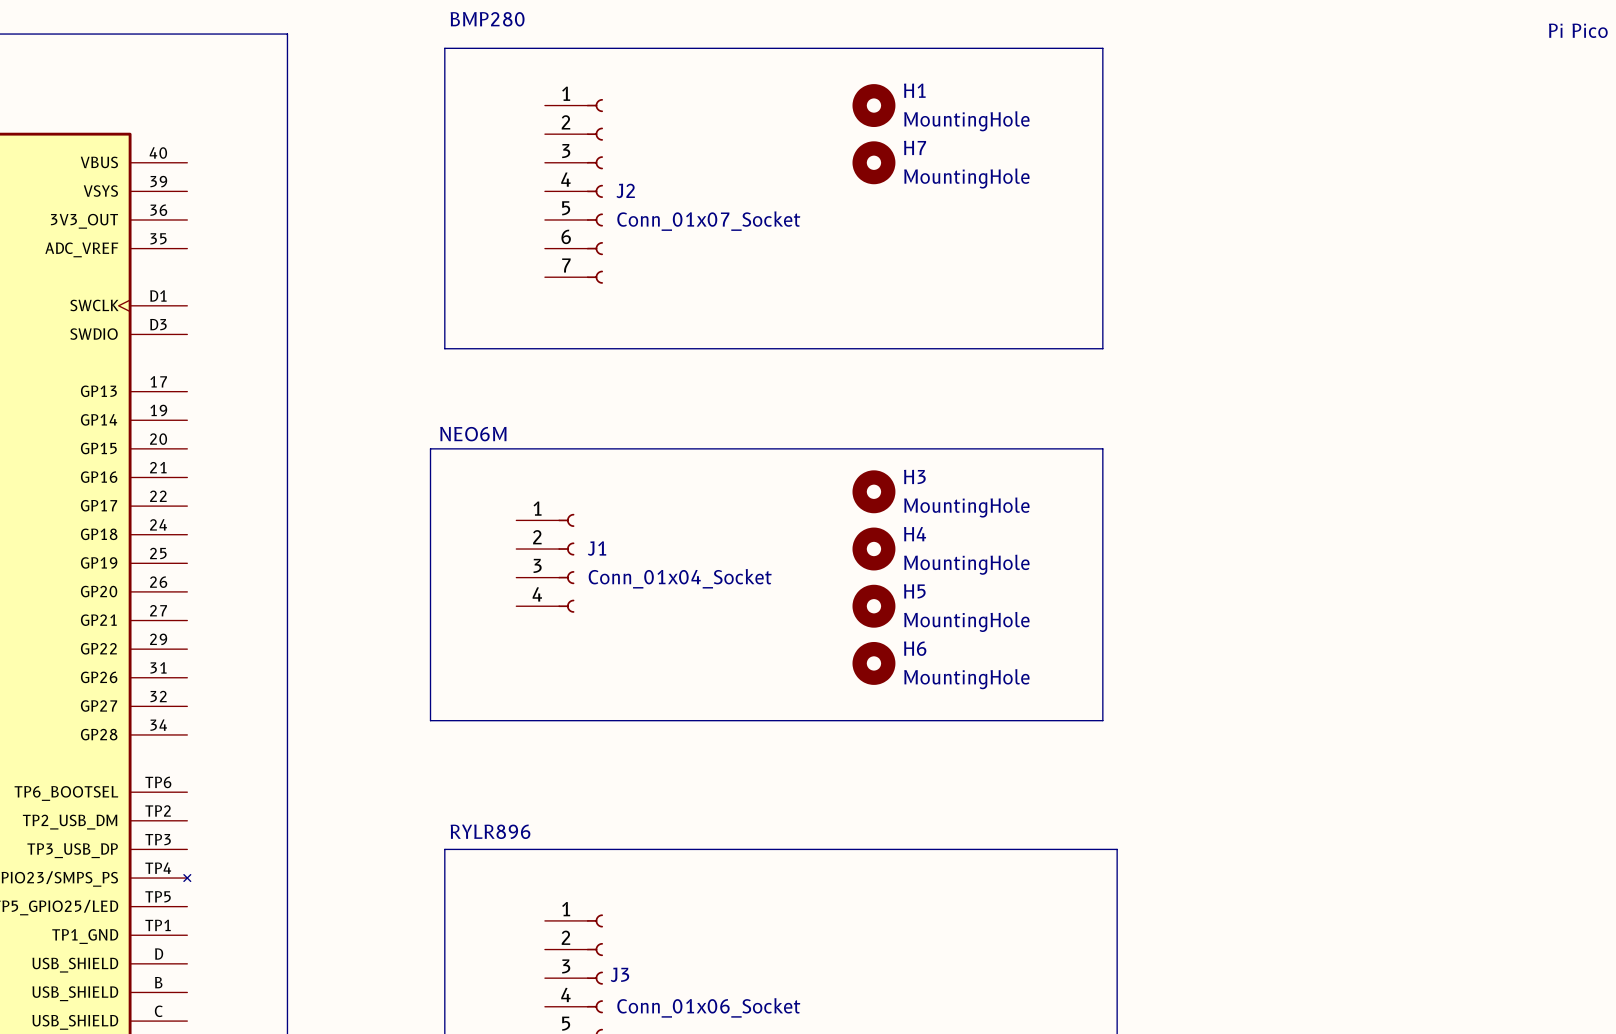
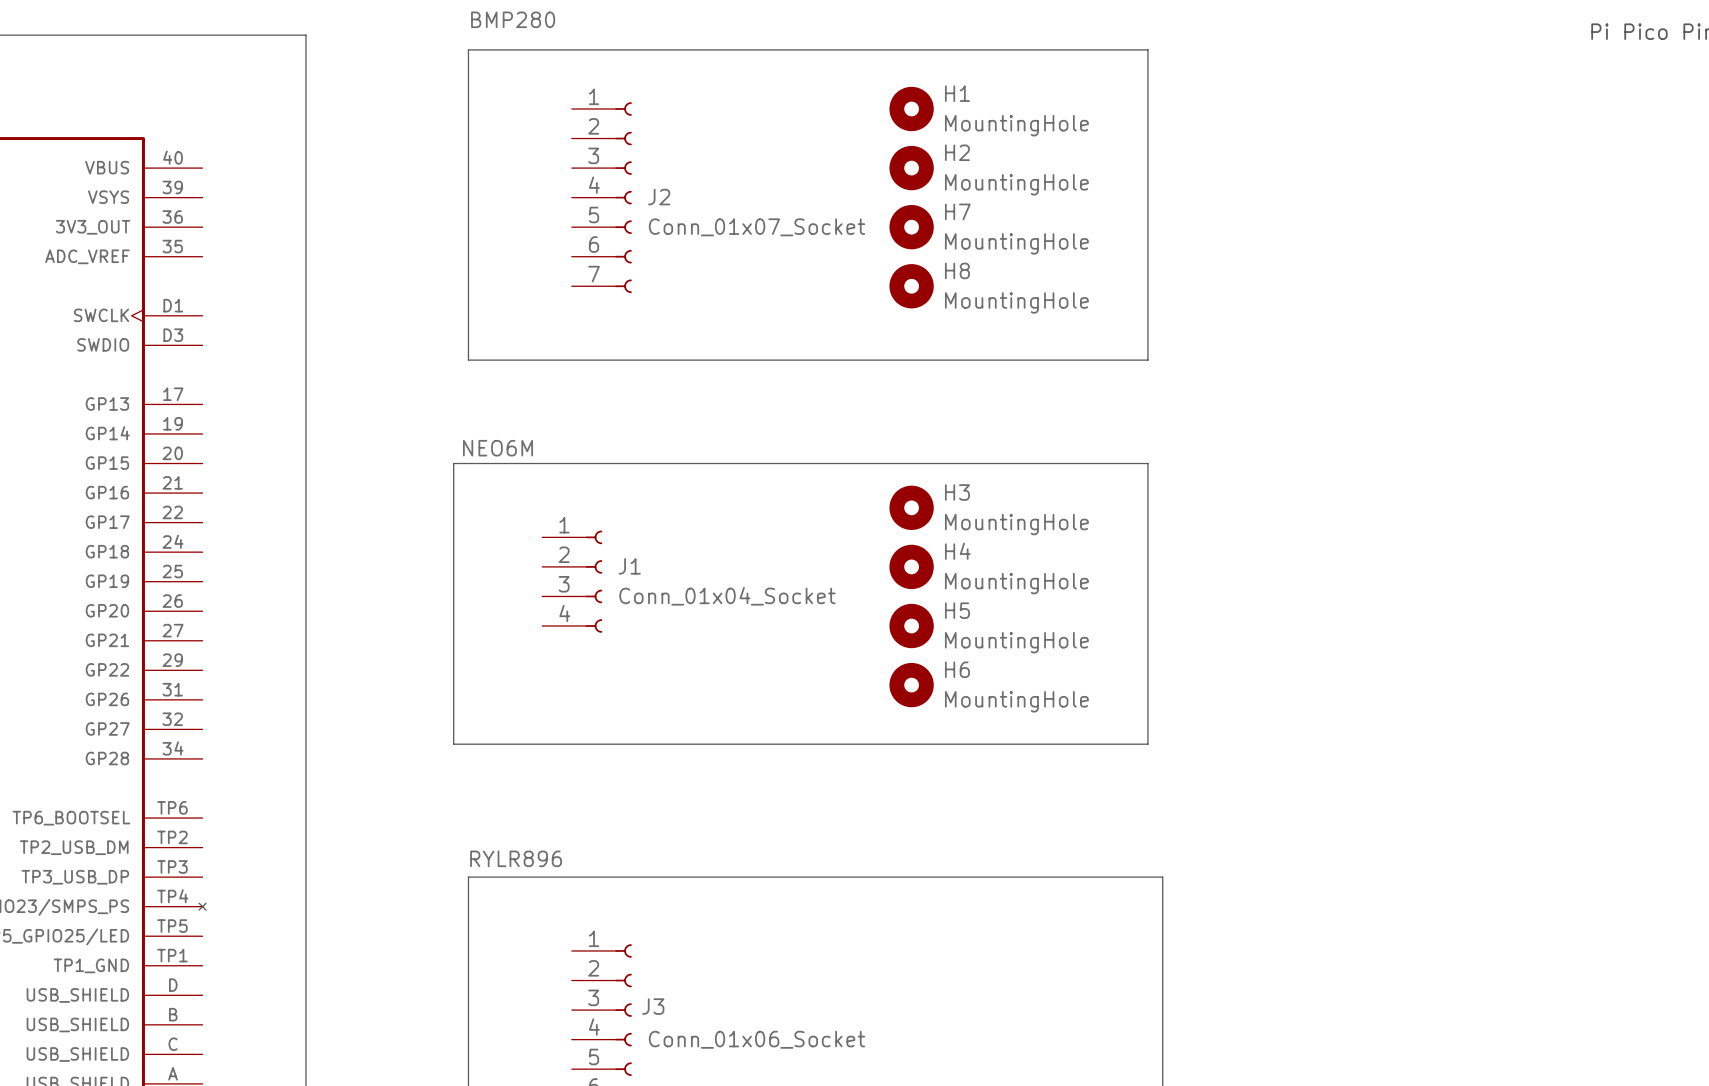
H7 name: H7 (915, 147) -> H2 (957, 152)
H7: none -> MountingHole (911, 227)
H8: none -> MountingHole (911, 286)

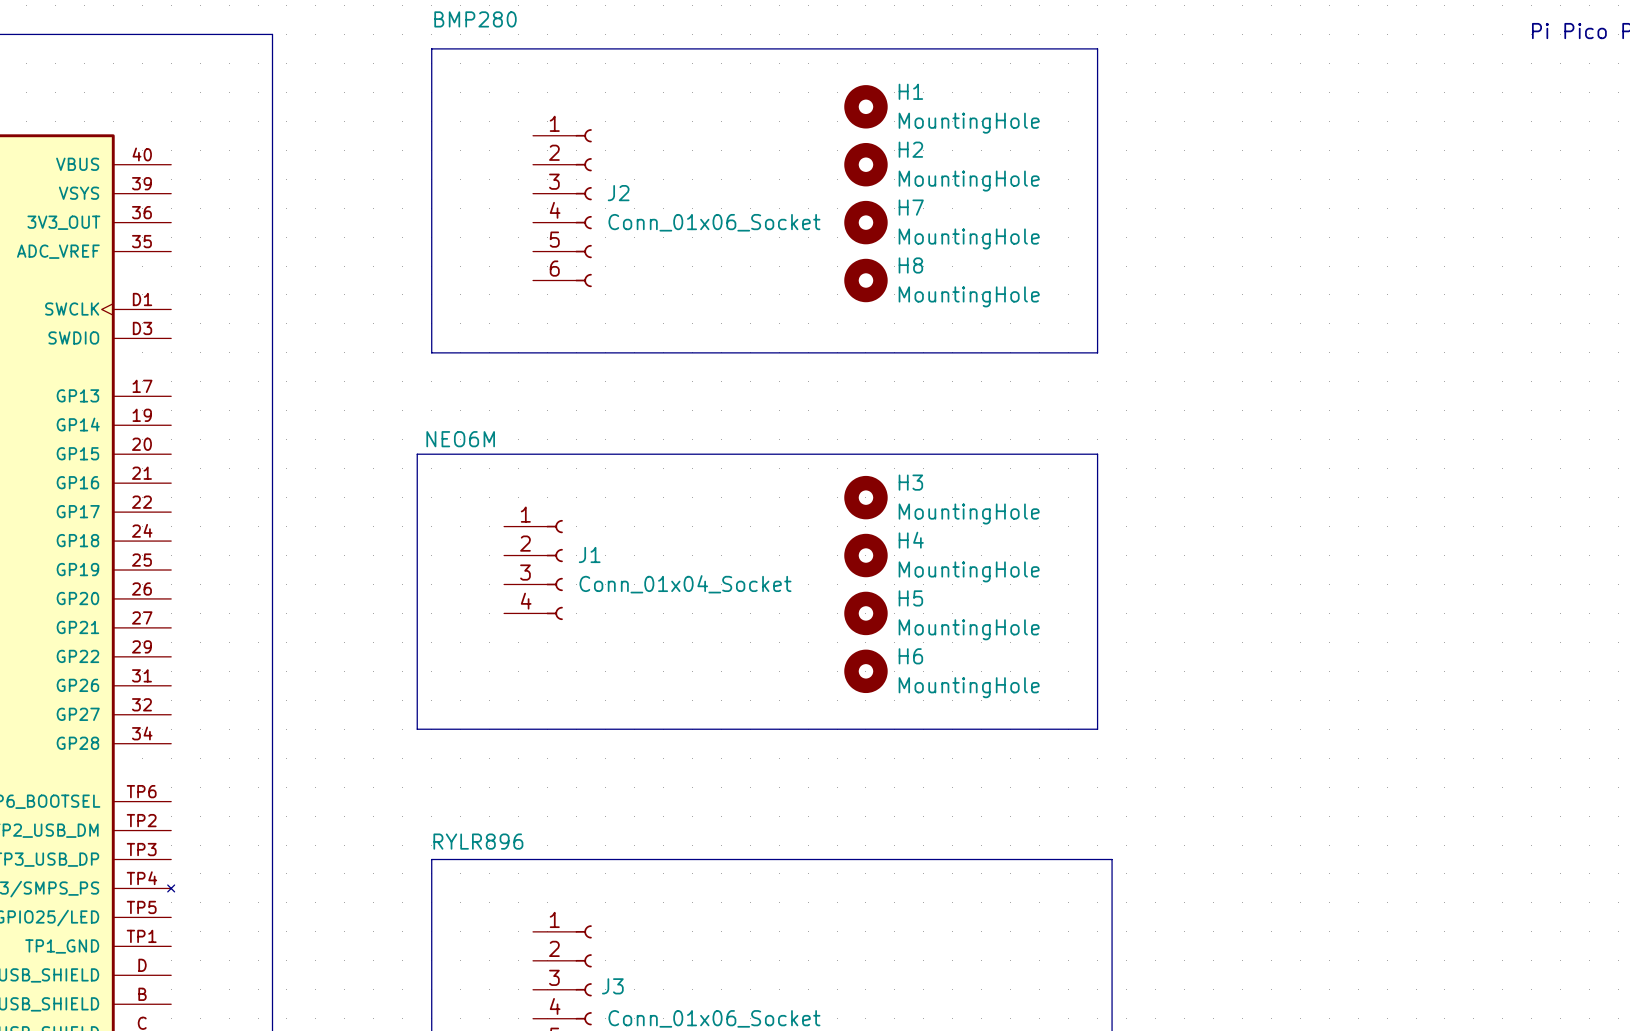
J2 symbol: [571, 102, 632, 294] -> [533, 129, 592, 288]
J2 value: Conn_01x07_Socket (756, 227) -> Conn_01x06_Socket (714, 222)

